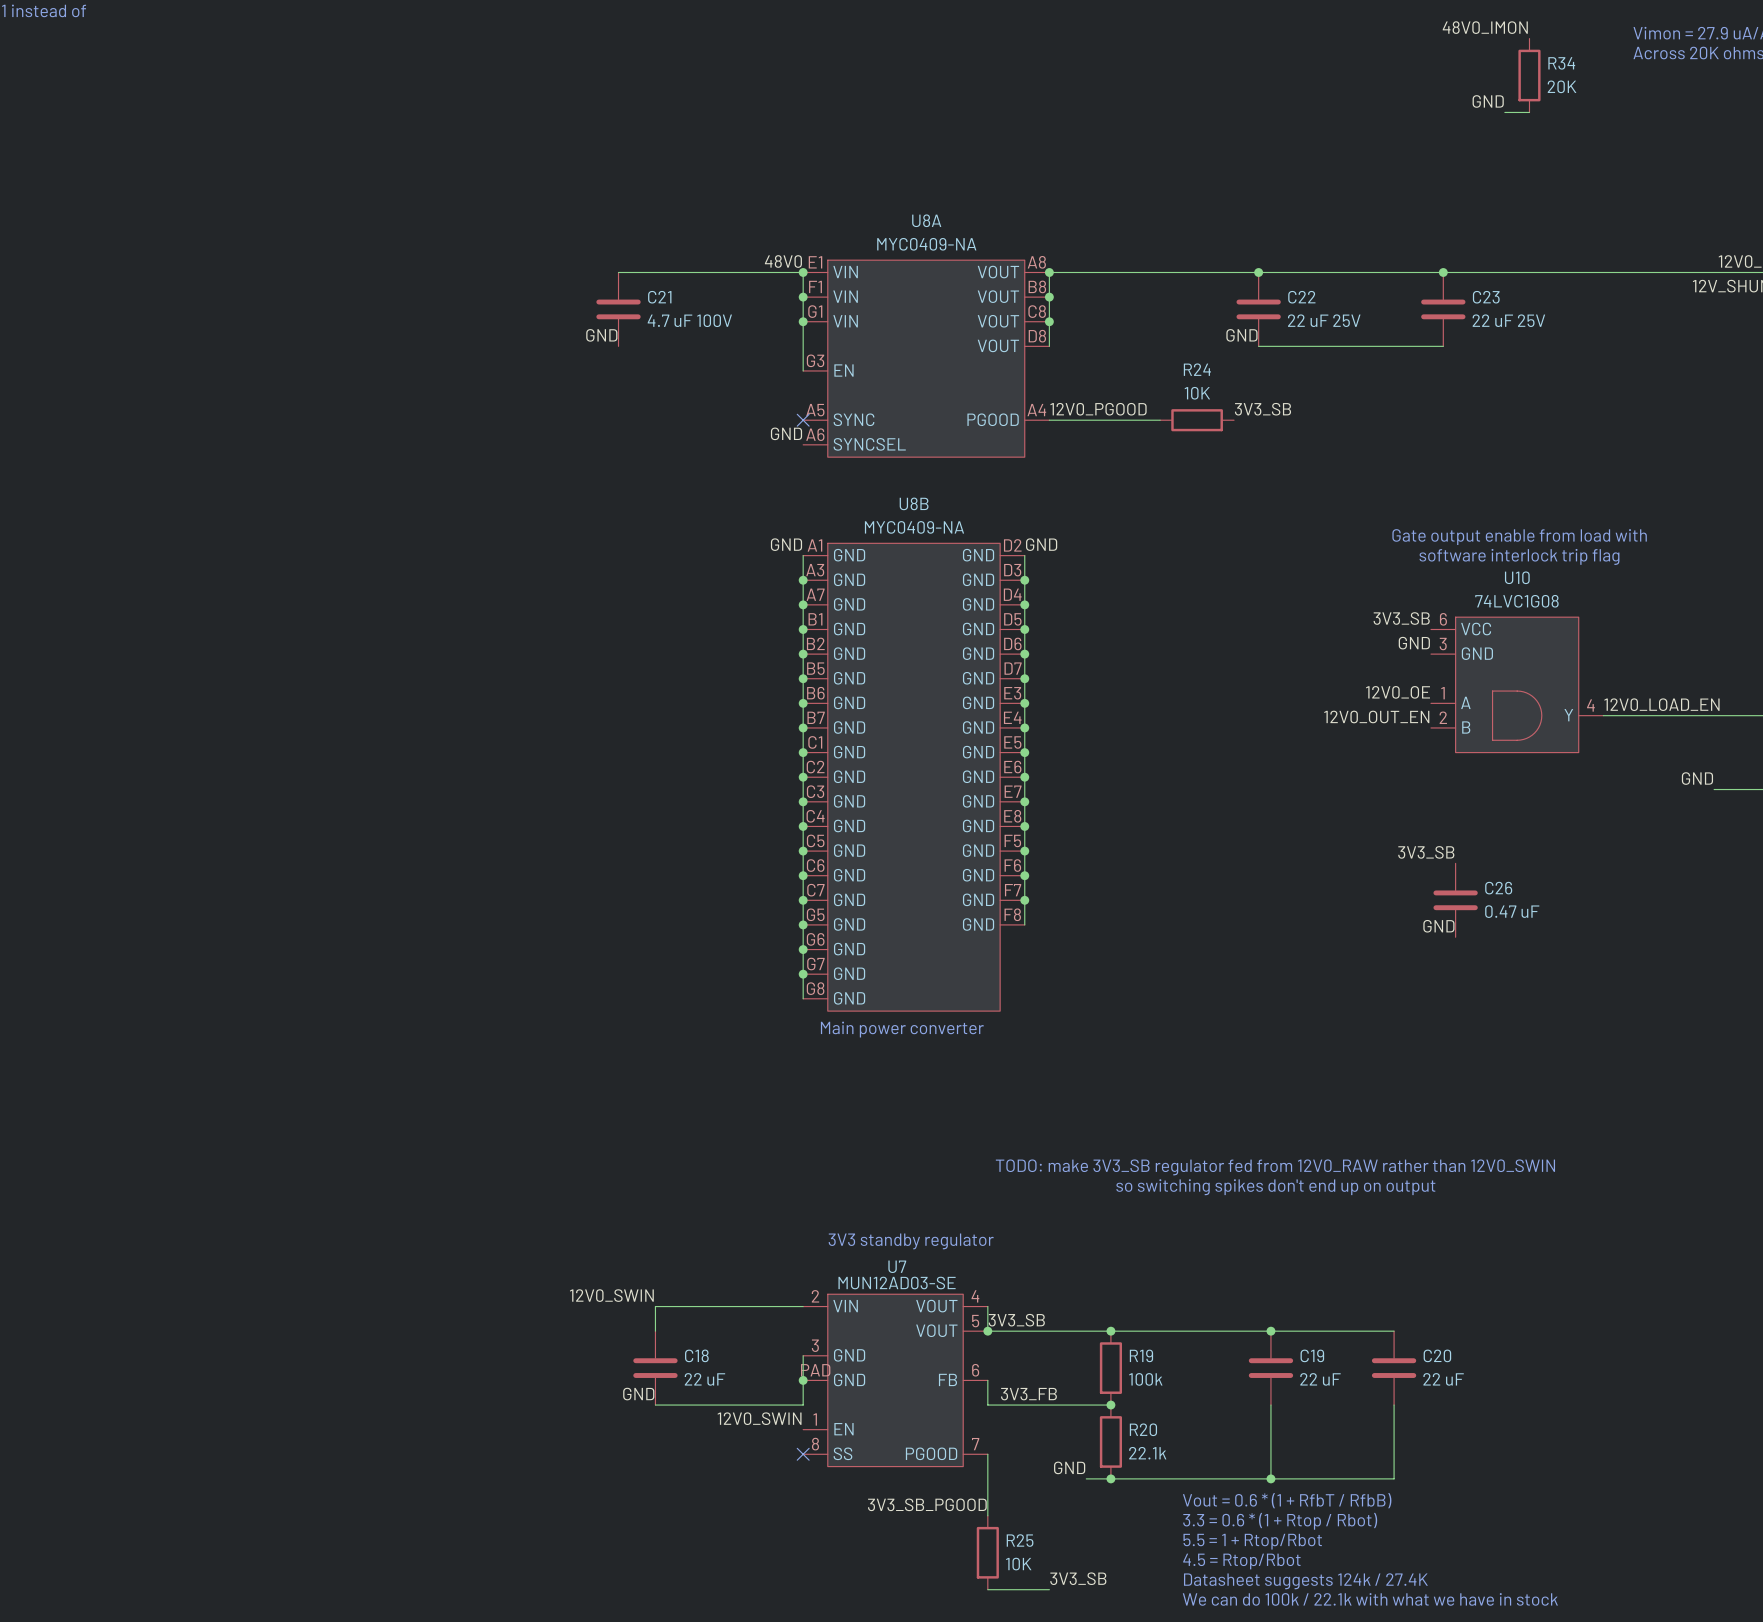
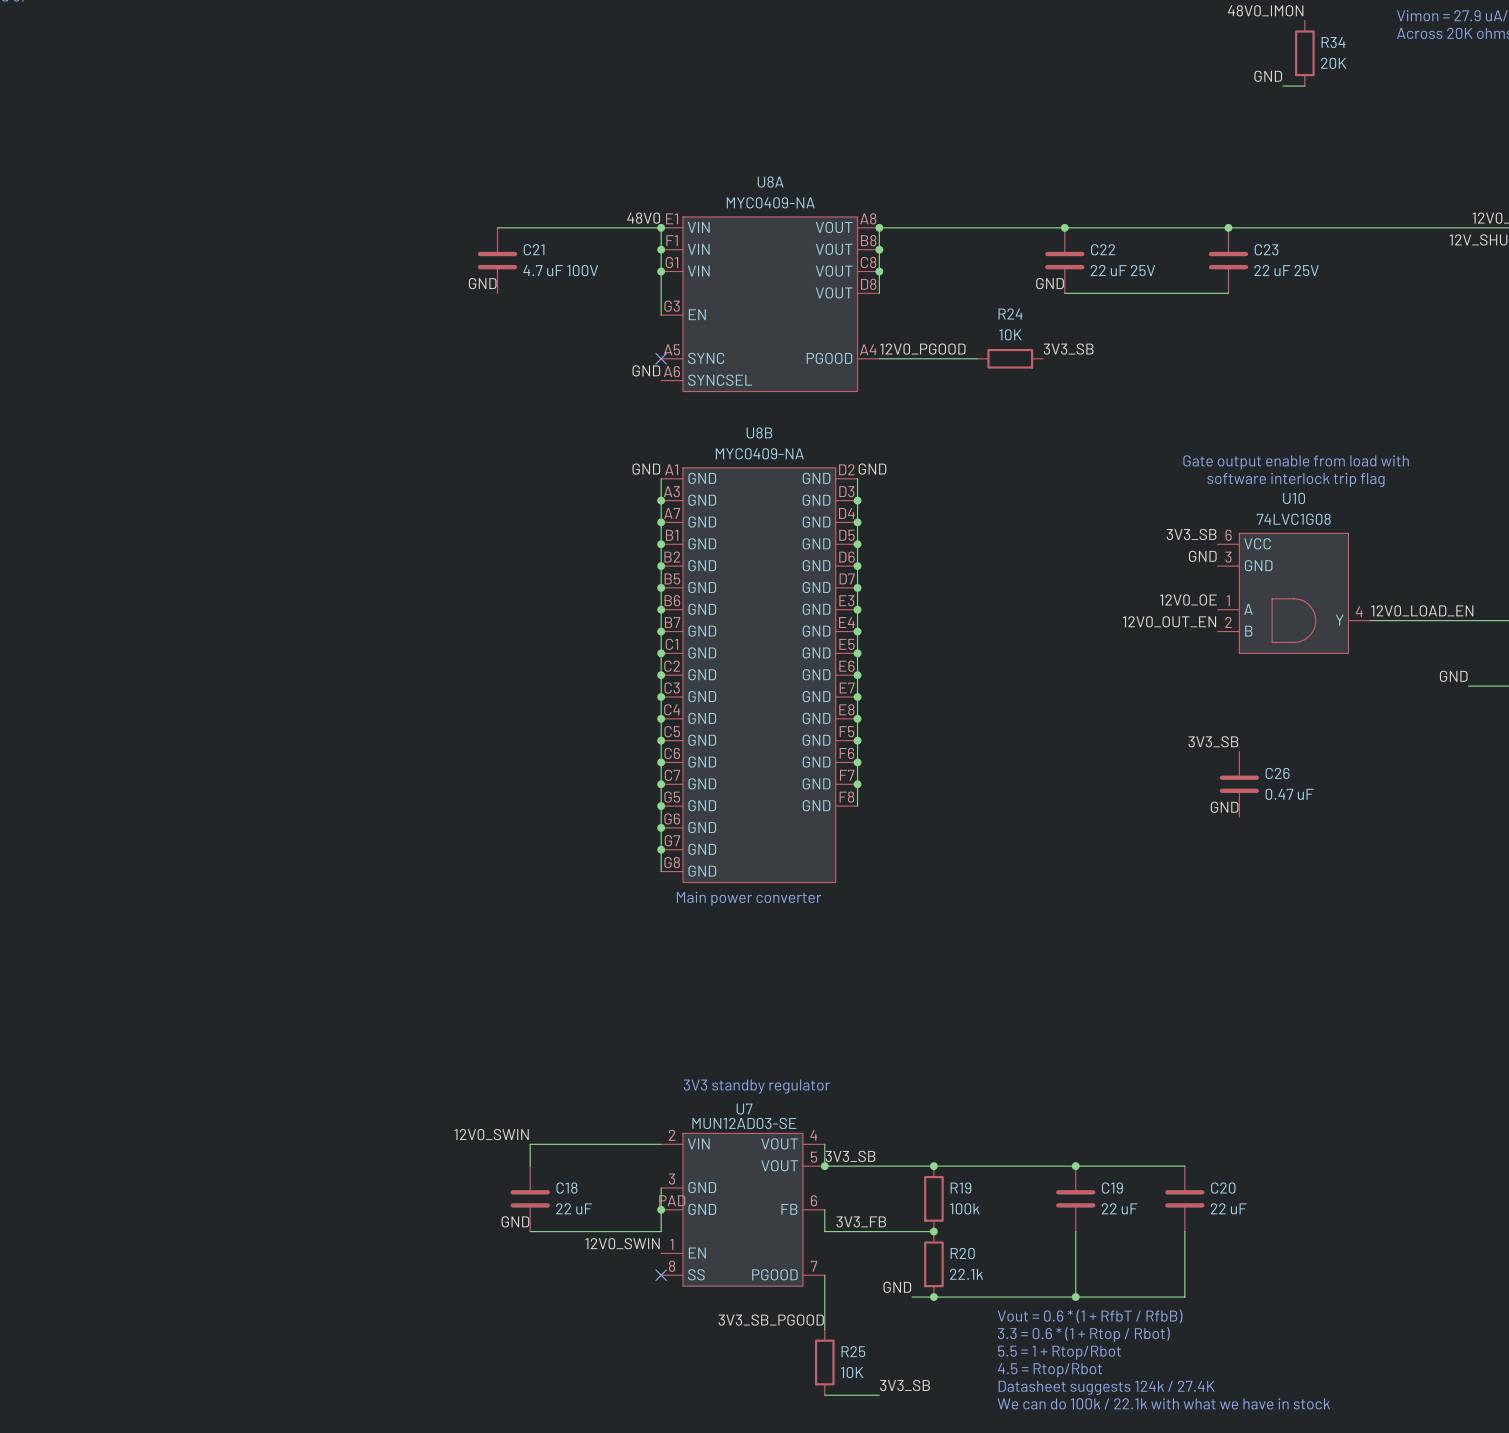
text: TODO: make 3V3_SB regulator fed from 12V0_RAW rather than 12V0_SWIN (1275, 1167) -> none
text: so switching spikes don't end up on output (1275, 1187) -> none

